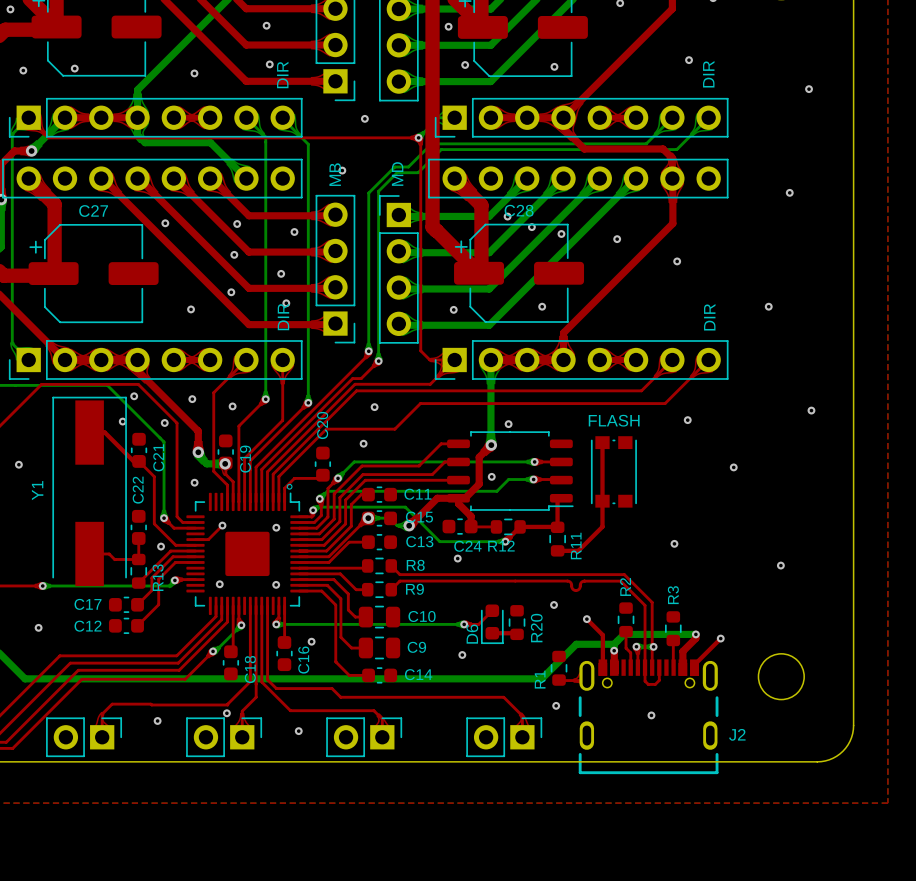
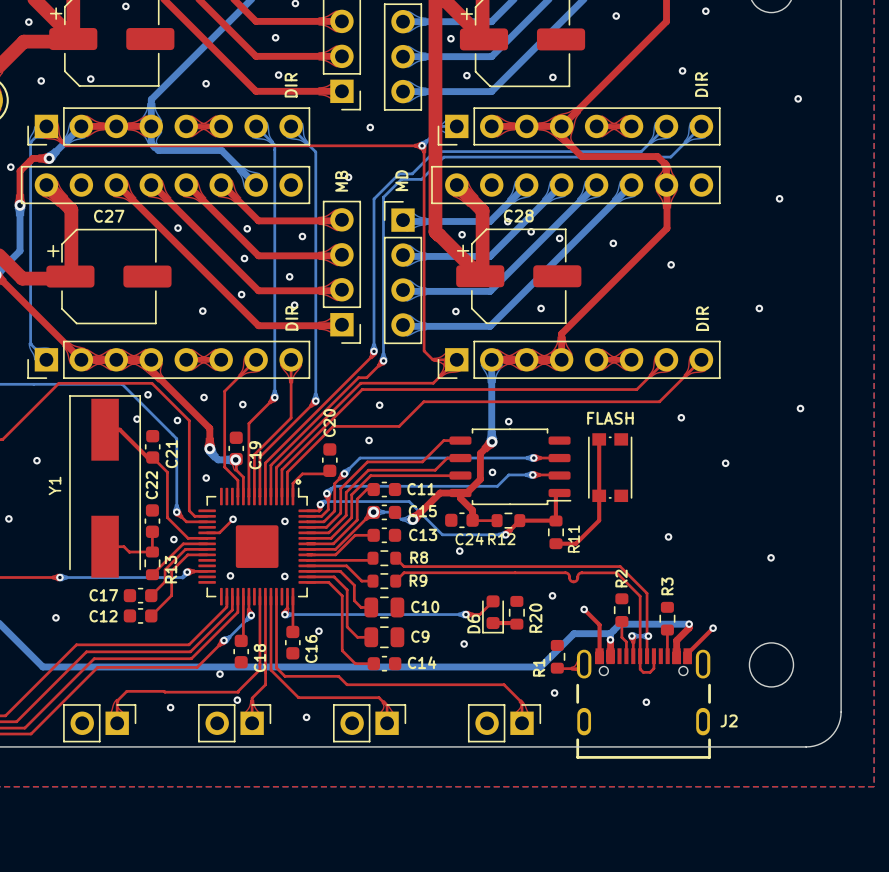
via: none -> (462, 234)
via: none -> (220, 674)

